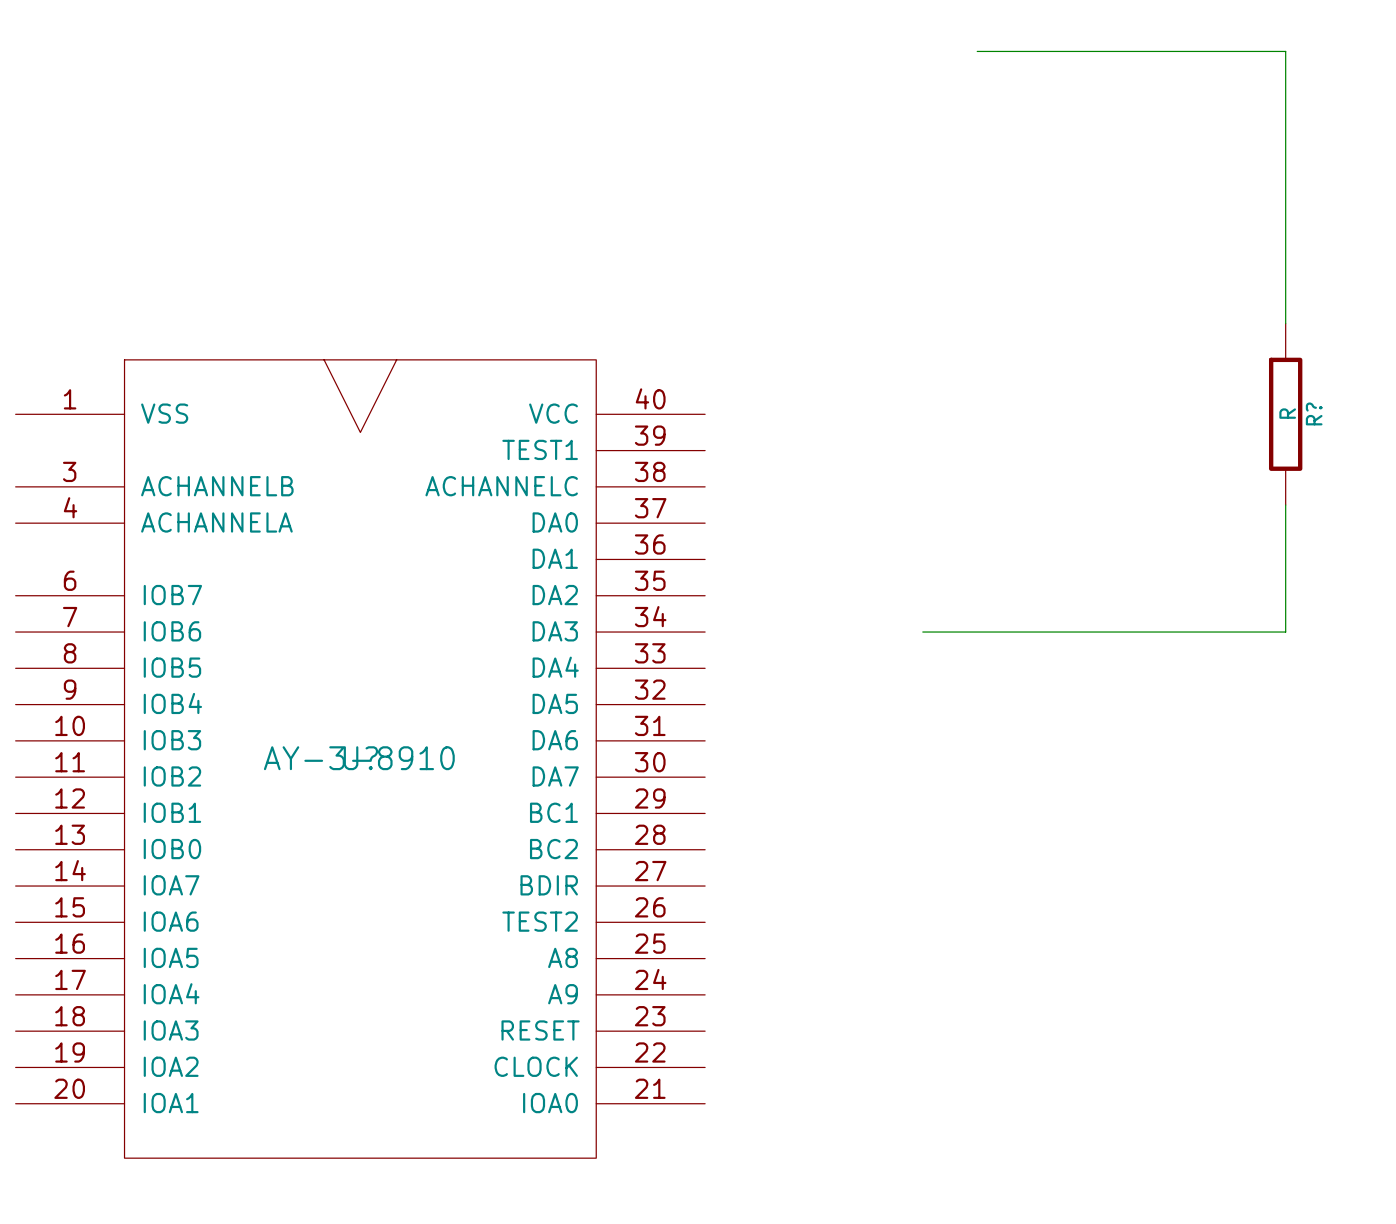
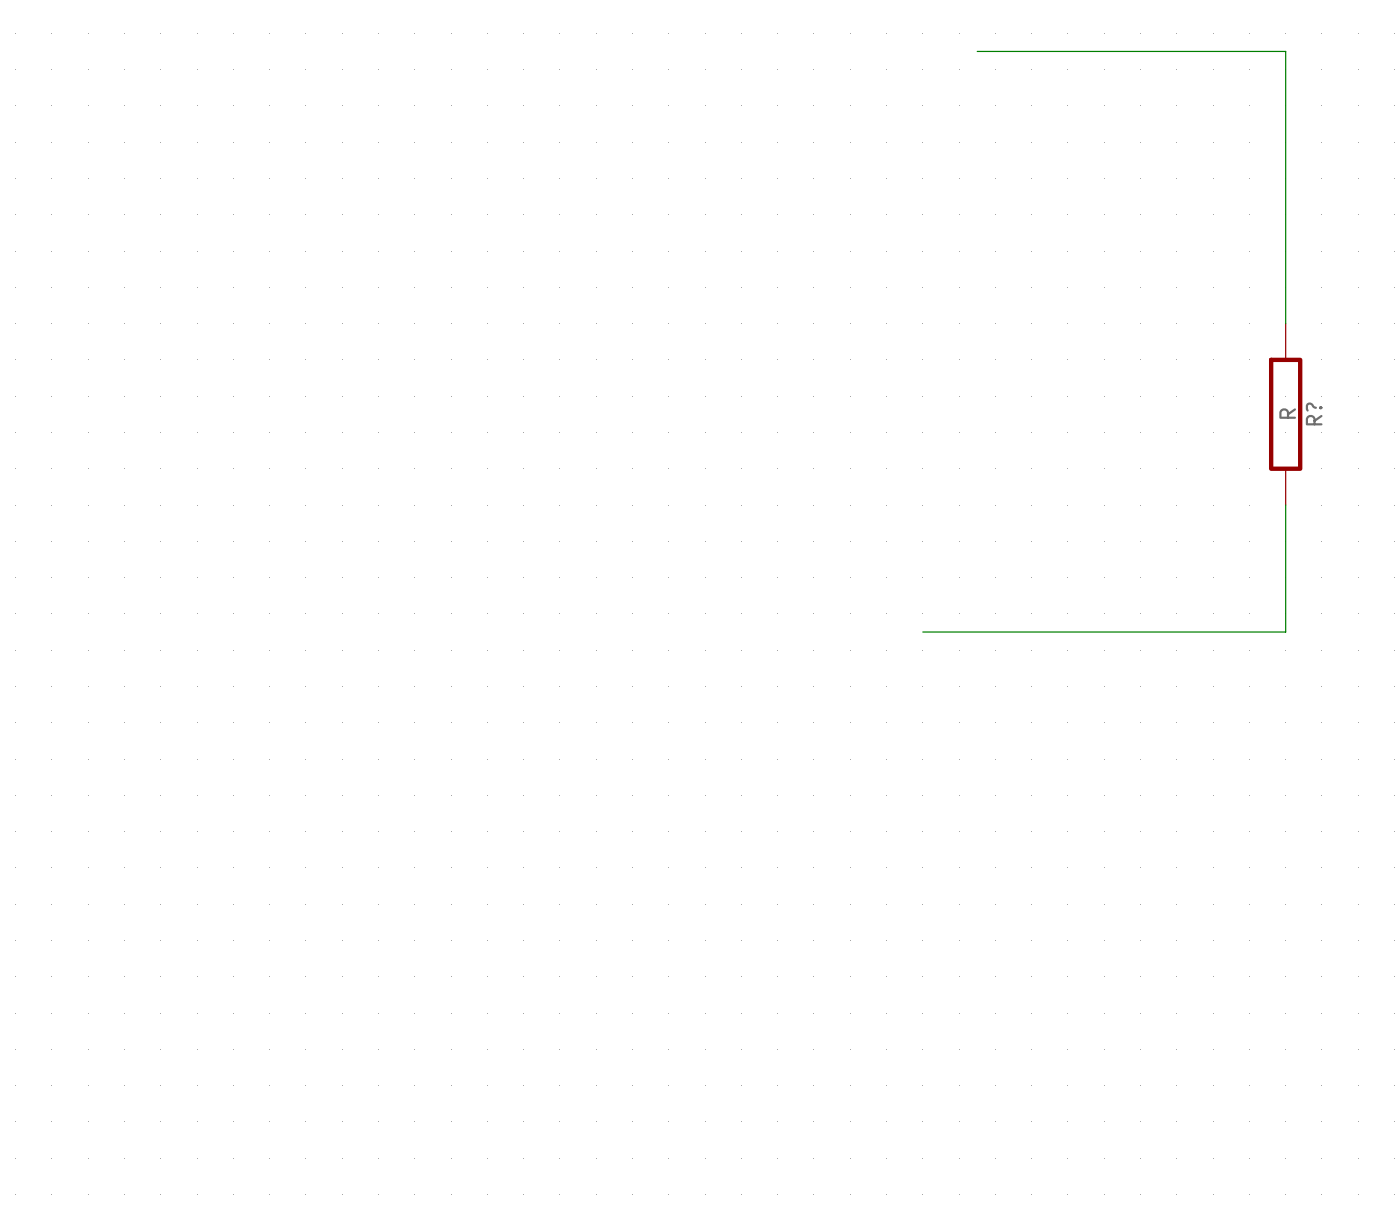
U?: AY-3-8910 (360, 759) -> none

